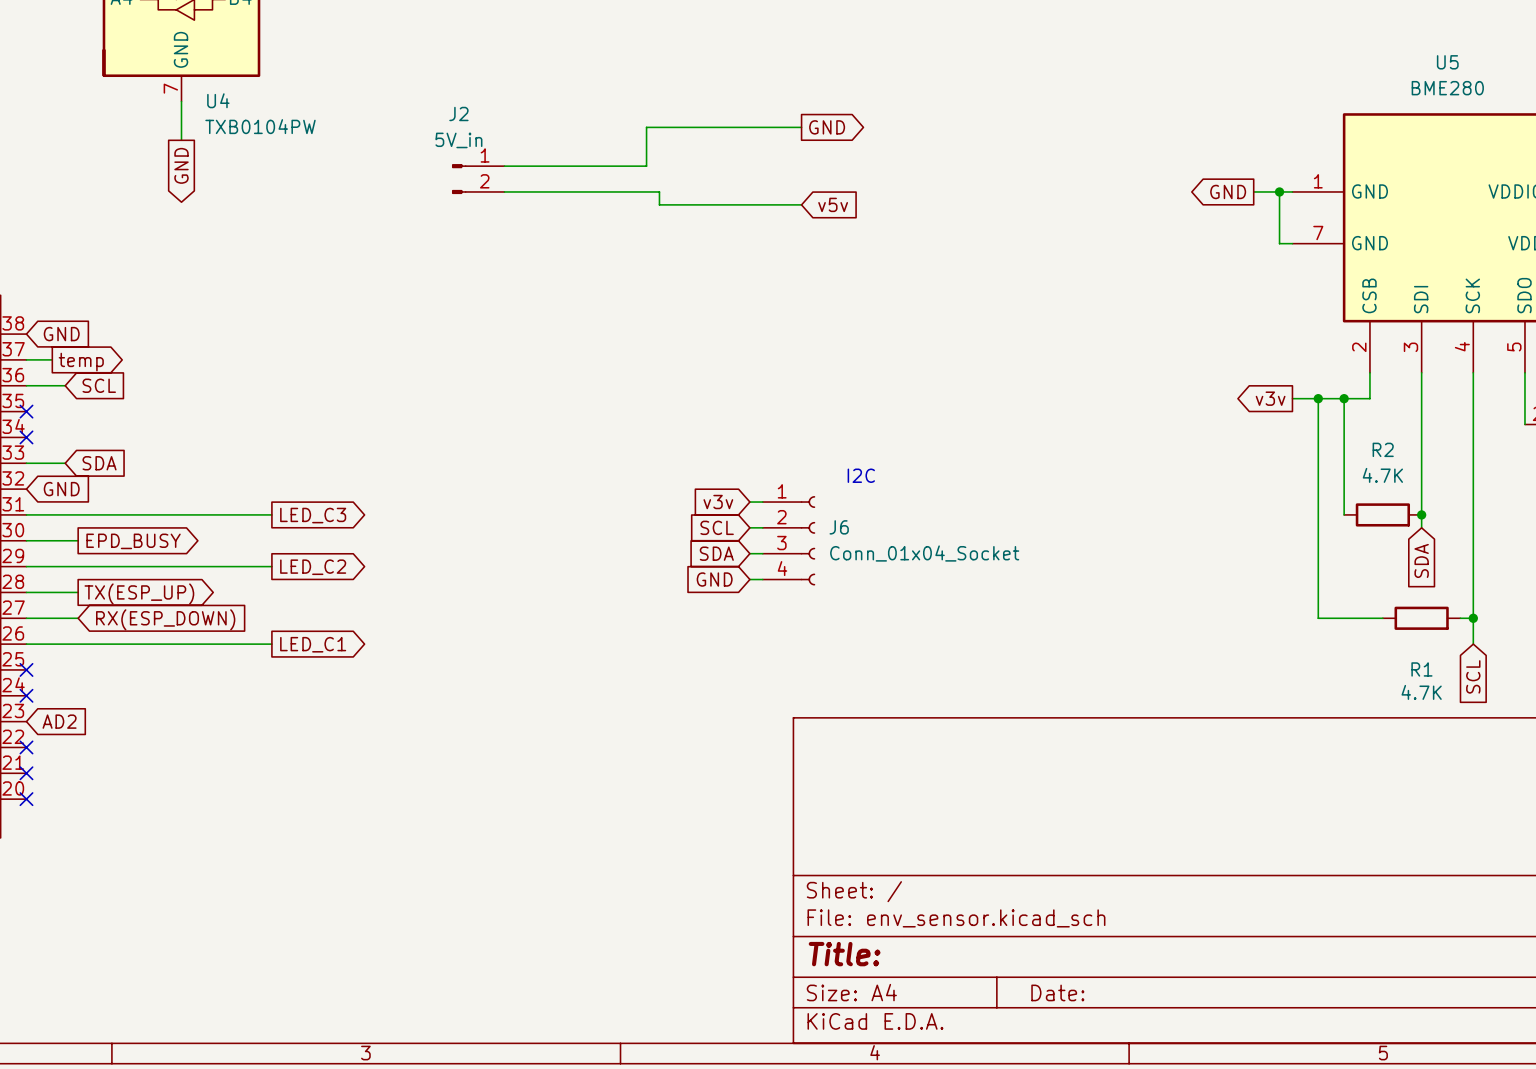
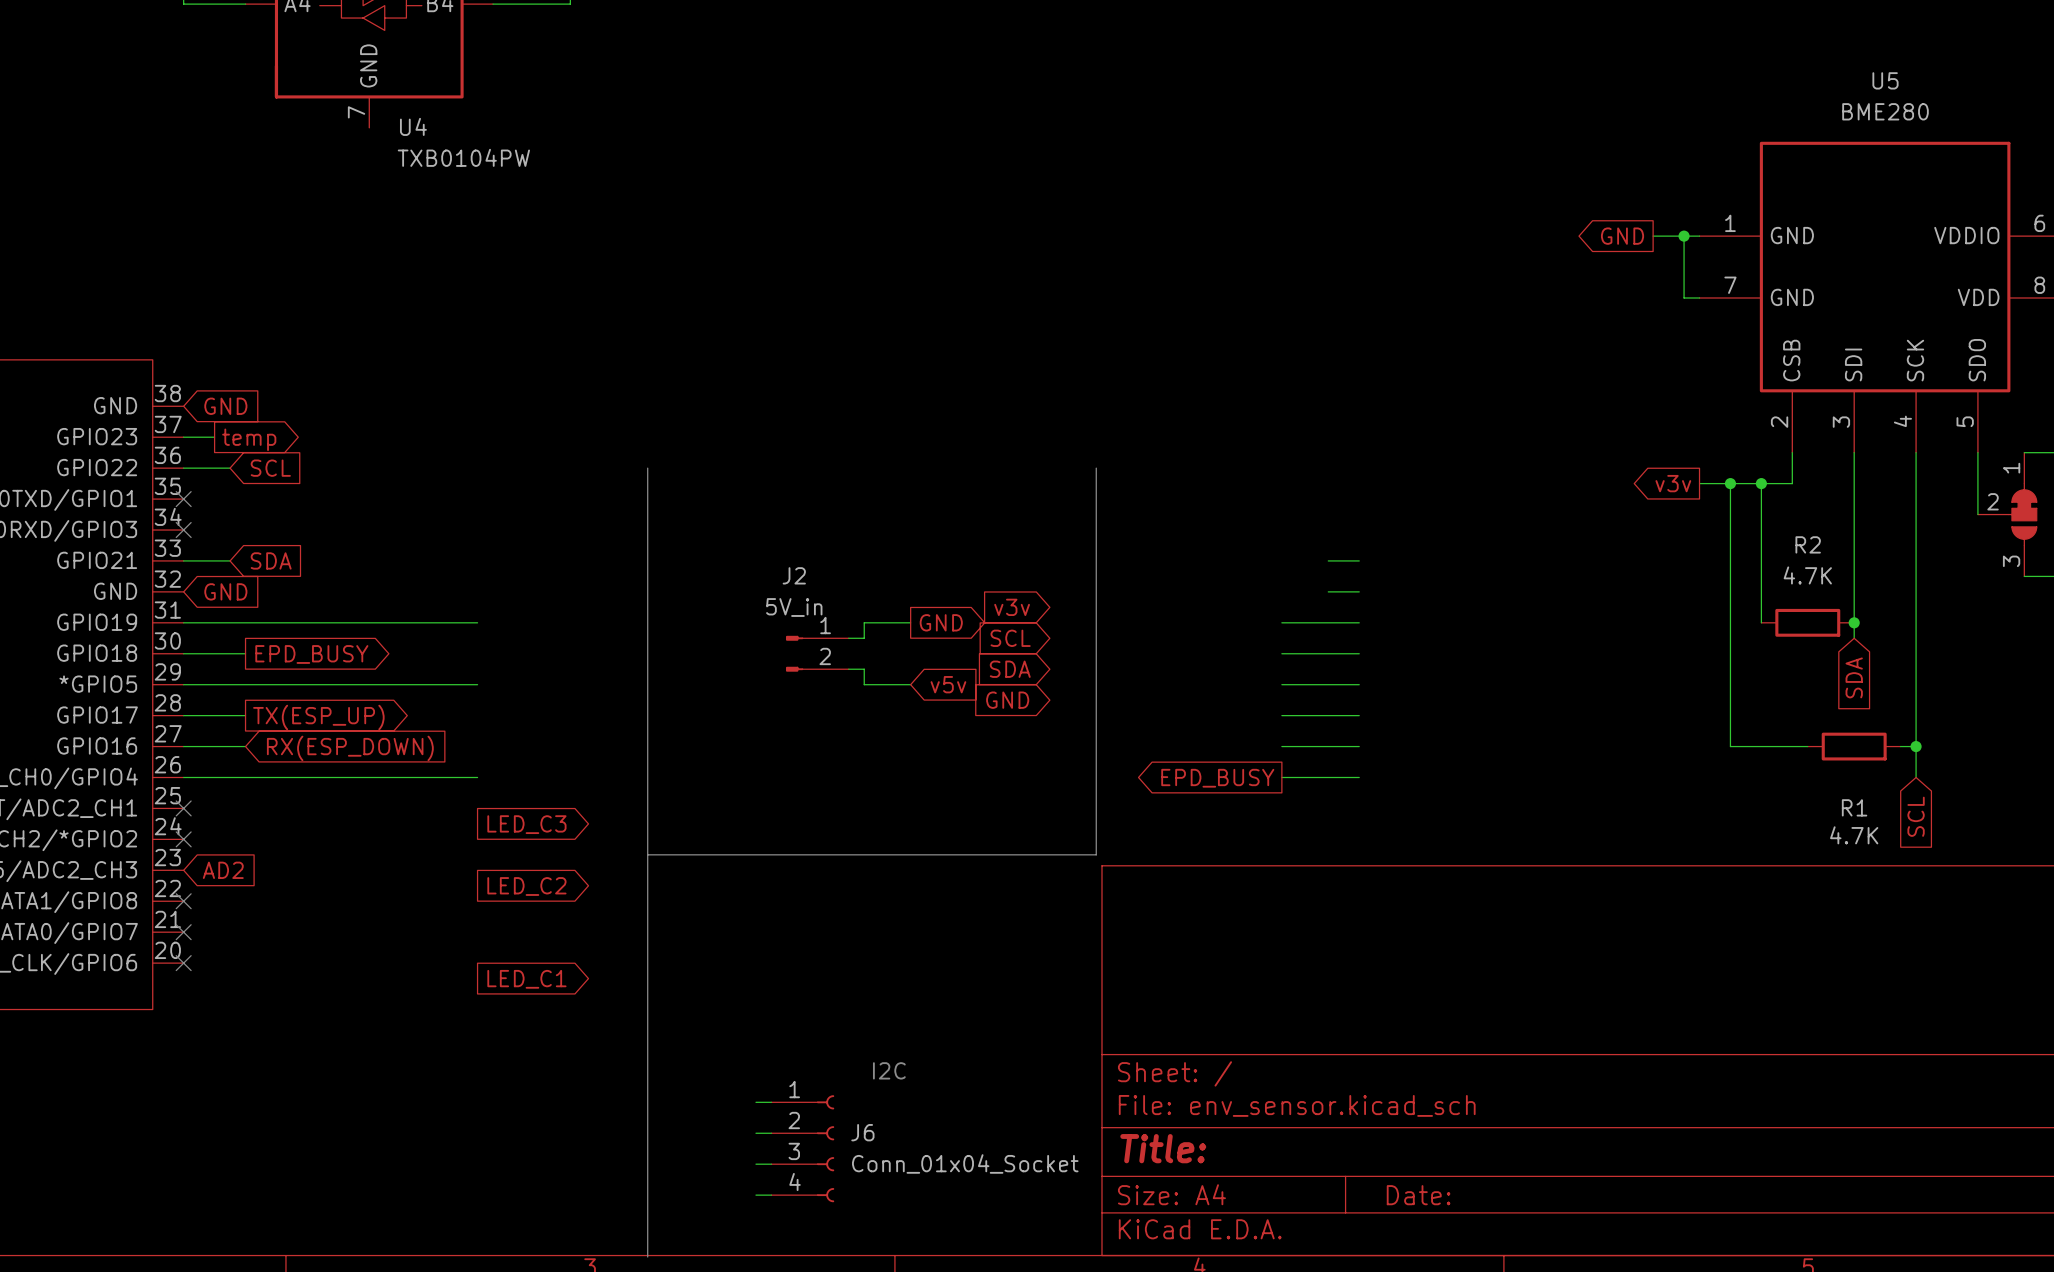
wire: (181, 101) (181, 140) -> none
wire: (801, 127) (646, 127) (646, 166) (504, 166) -> none
global label: GND (827, 127) -> none
global label: GND (181, 165) -> none
J2 position: (478, 179) -> (817, 653)
wire: (504, 191) (659, 191) (659, 204) (801, 204) -> none
global label: v5v (833, 204) -> none
line: none -> (647, 468) (647, 1257)
line: none -> (1096, 468) (1096, 854) (647, 854)
wire: none -> (1328, 560) (1359, 560)
text: I2C (861, 475) -> none
wire: none -> (1328, 591) (1359, 591)
wire: (749, 502) (762, 502) -> none
wire: none -> (910, 622) (864, 622) (864, 638) (848, 638)
global label: none -> GND (941, 622)
wire: none -> (1281, 622) (1359, 622)
global label position: LED_C3 (313, 515) -> LED_C3 (526, 824)
wire: (749, 527) (762, 527) -> none
J6 position: (789, 540) -> (802, 1148)
wire: none -> (1281, 653) (1359, 653)
wire: none -> (848, 669) (864, 669) (864, 684) (910, 684)
wire: (749, 553) (762, 553) -> none
global label: none -> v5v (948, 684)
wire: none -> (1281, 684) (1359, 684)
global label position: LED_C2 (313, 567) -> LED_C2 (526, 886)
wire: (749, 579) (762, 579) -> none
wire: none -> (1281, 715) (1359, 715)
wire: none -> (1281, 746) (1359, 746)
global label position: LED_C1 (313, 644) -> LED_C1 (526, 979)
global label: none -> EPD_BUSY (1217, 778)
wire: none -> (1281, 777) (1359, 777)
text: none -> I2C (889, 1070)
wire: none -> (755, 1102) (771, 1102)
wire: none -> (755, 1133) (771, 1133)
wire: none -> (755, 1164) (771, 1164)
wire: none -> (755, 1195) (771, 1195)

